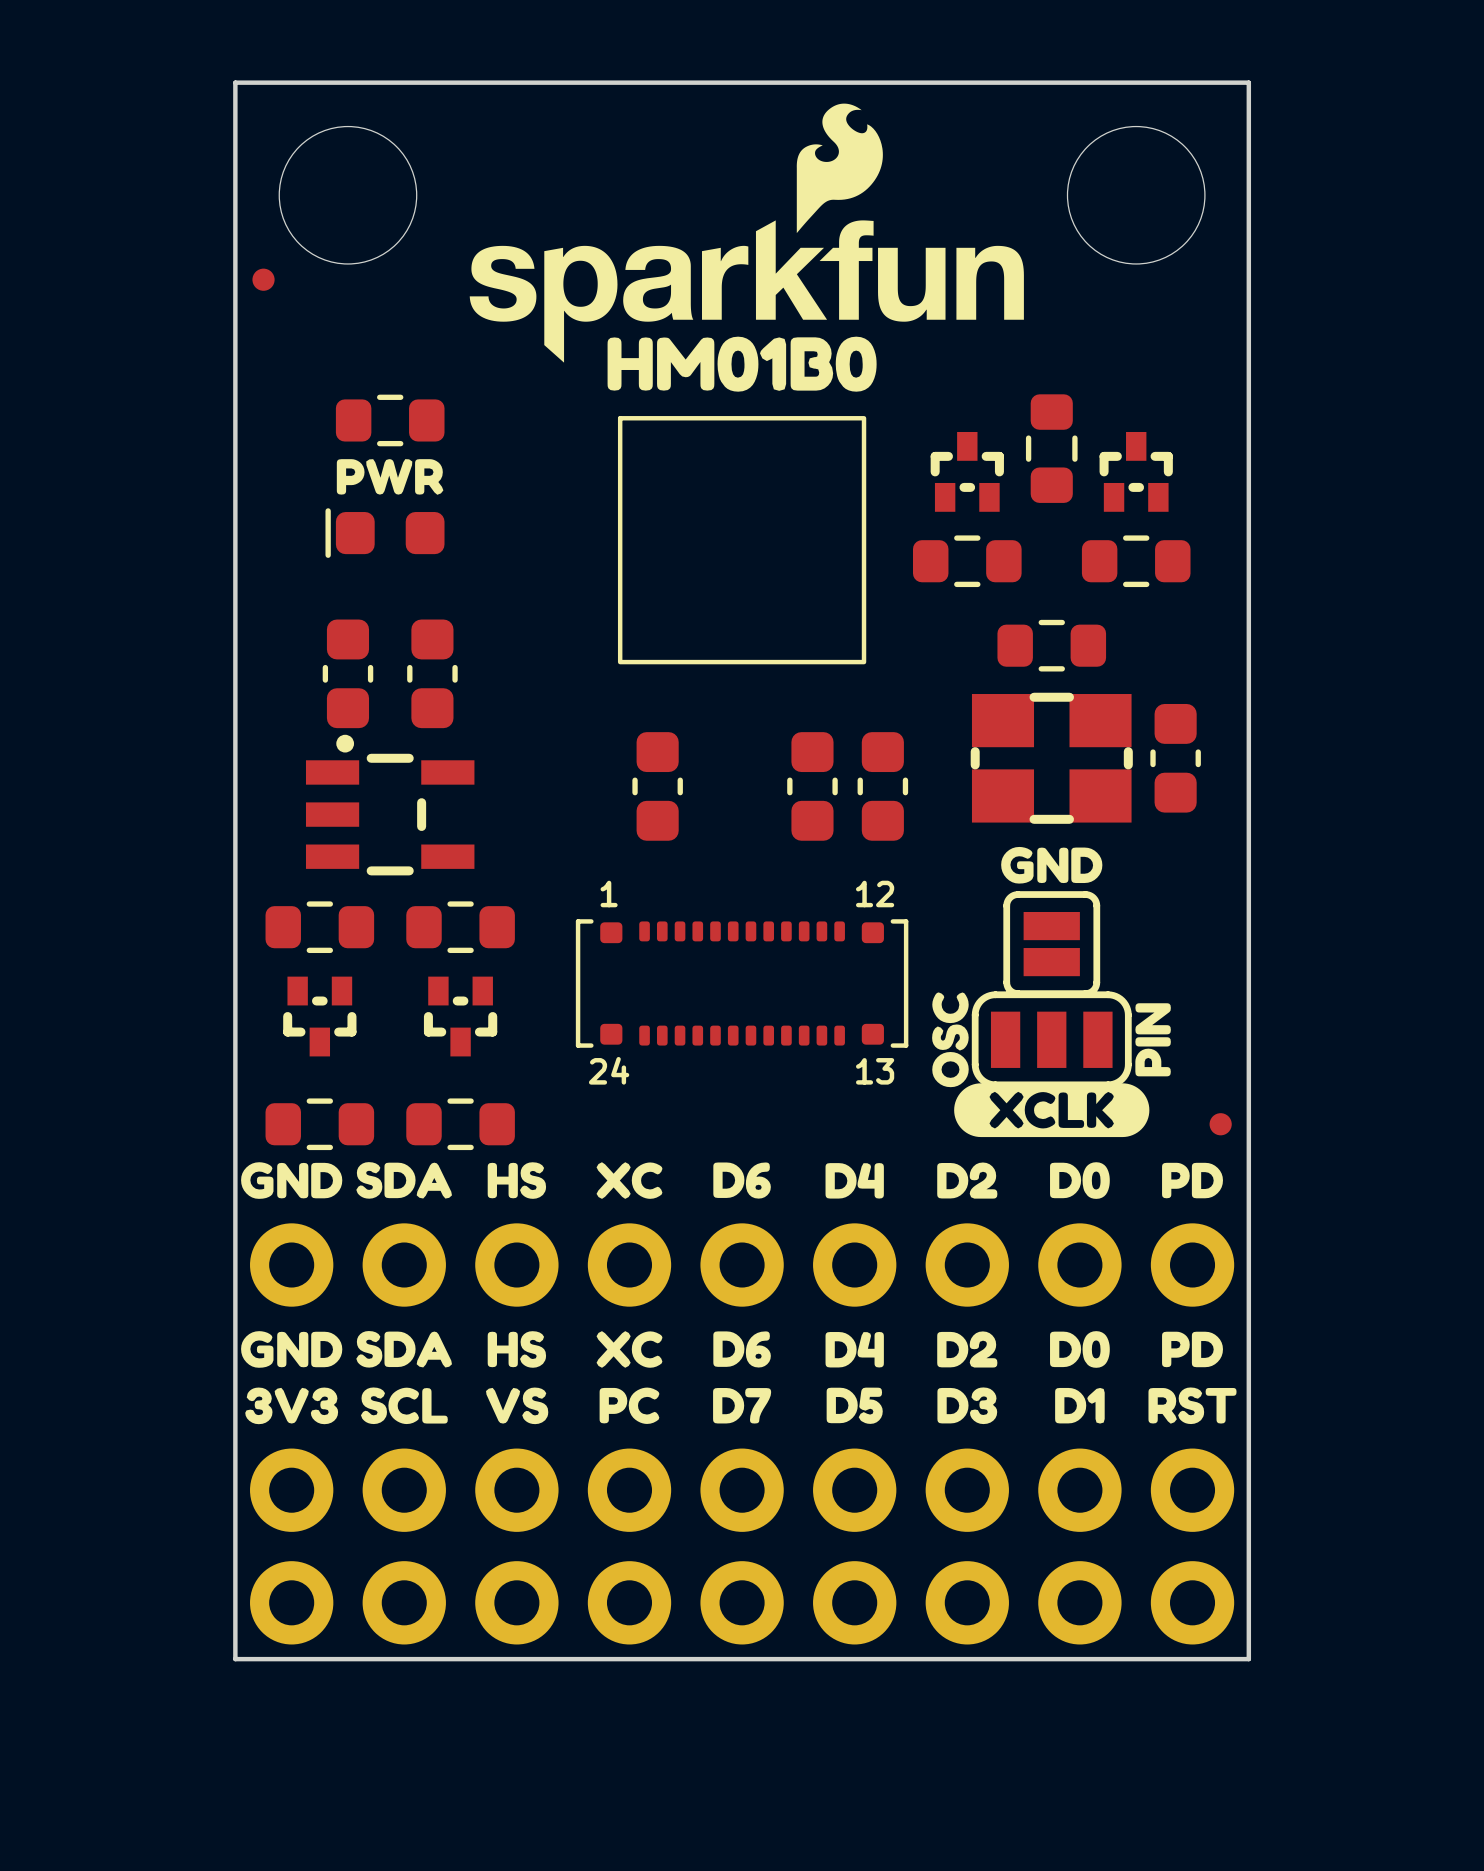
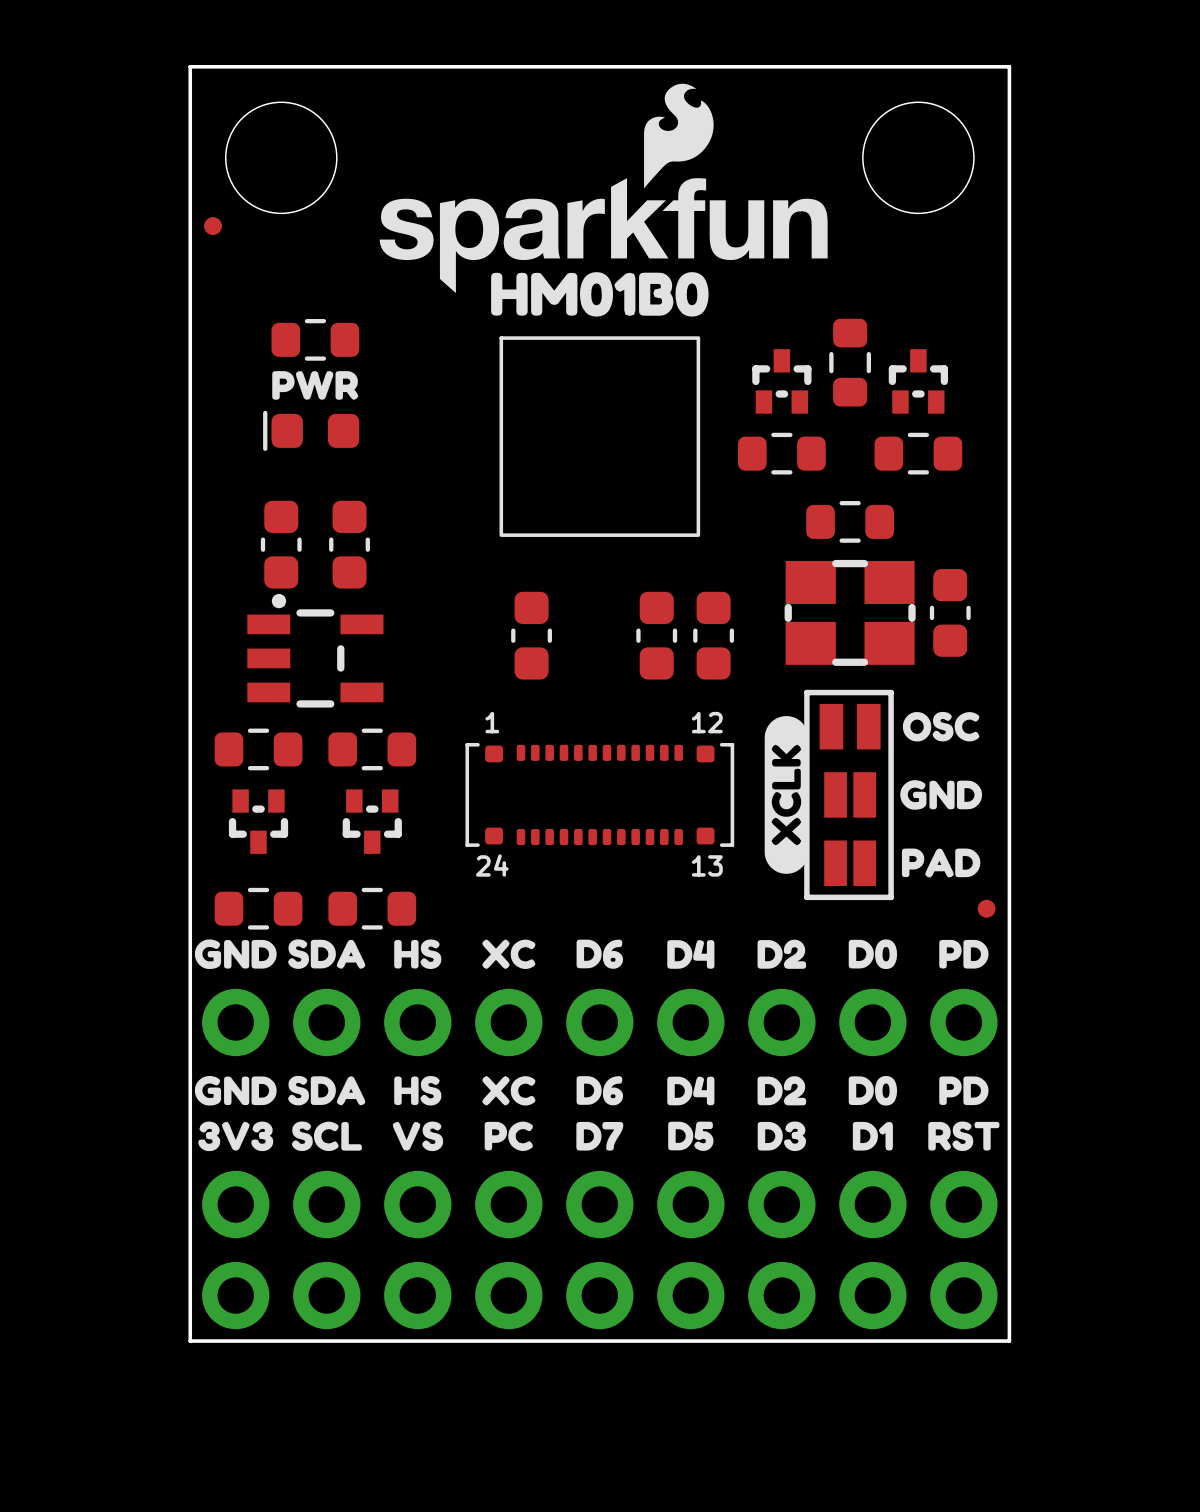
line: none -> (806, 692) (891, 692) (891, 897) (806, 897) (806, 692)
drawing position: (1051, 865) -> (941, 794)
drawing: none -> [902, 711, 980, 742]
drawing: none -> [764, 716, 809, 874]
part: none -> (850, 726)
part: (1051, 944) -> none
part: none -> (850, 794)
drawing: [932, 992, 1150, 1138] -> none
drawing shape: [1135, 1003, 1171, 1077] -> [901, 848, 981, 878]
part: (1051, 1039) -> none
part: none -> (850, 863)

